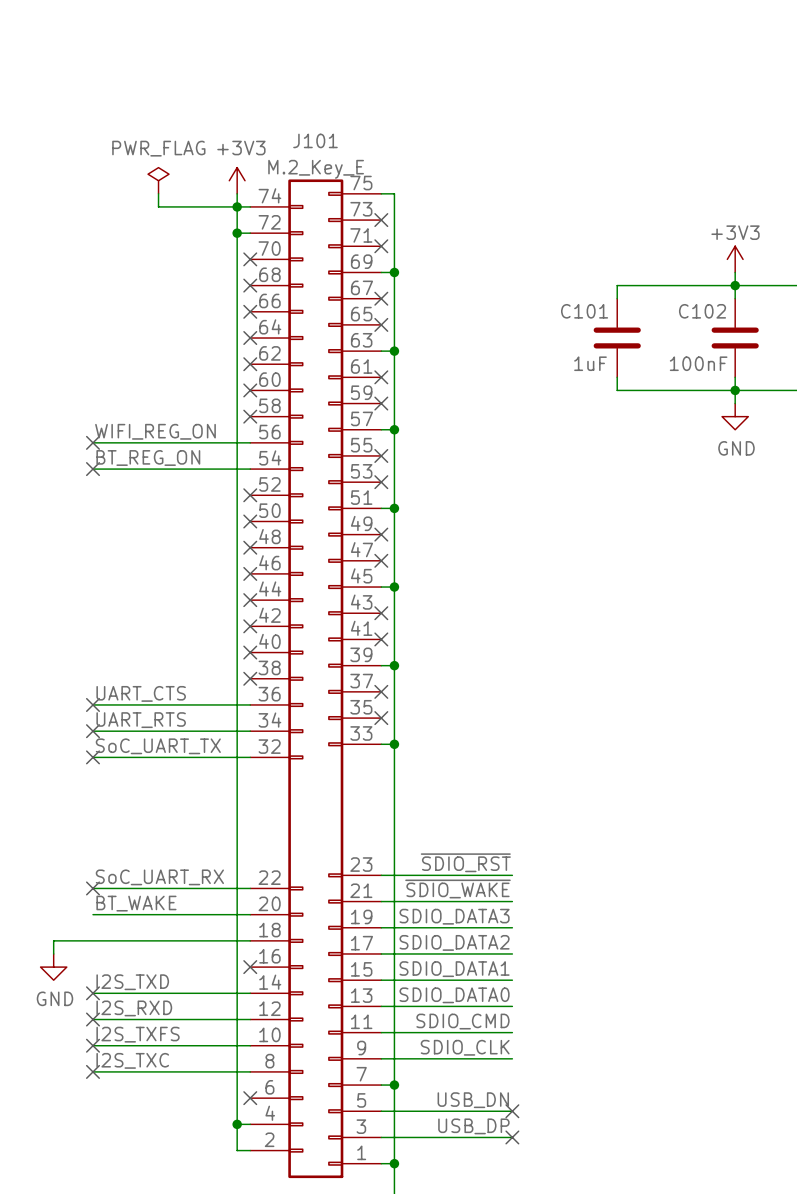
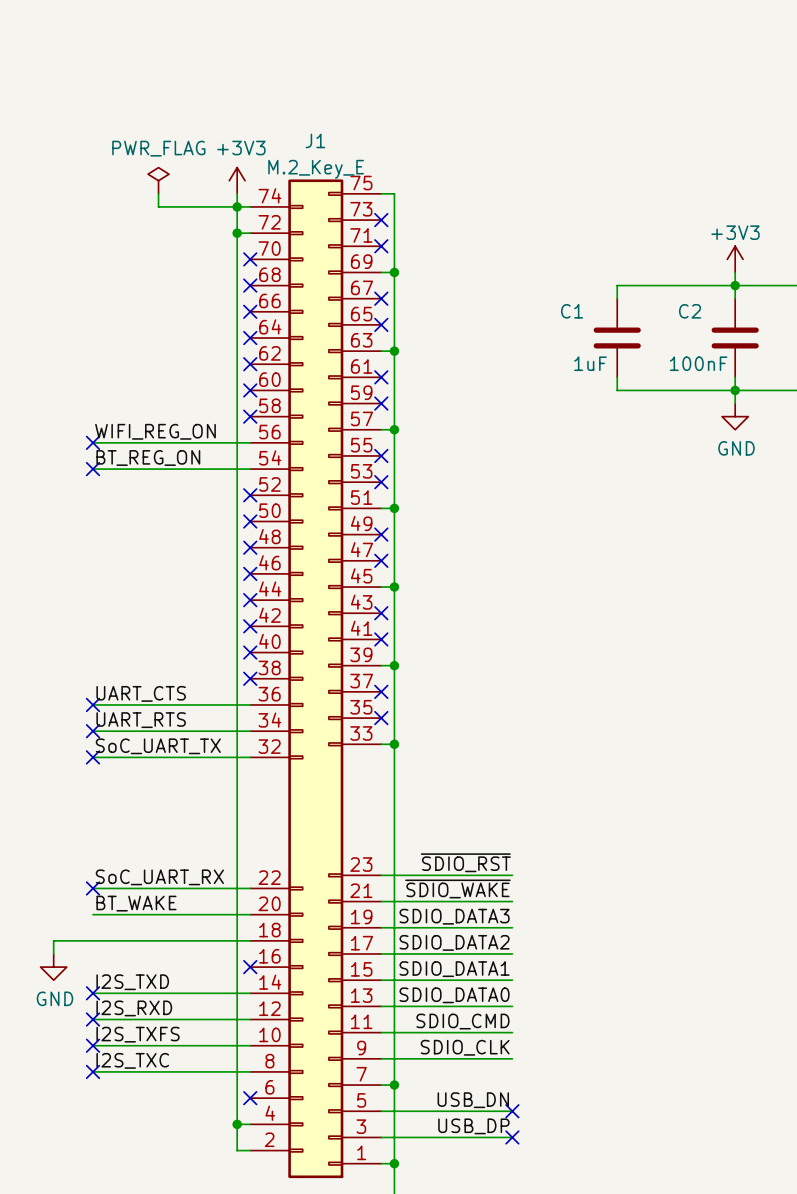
J101 name: J101 (315, 140) -> J1 (315, 140)
C101 name: C101 (584, 311) -> C1 (572, 311)
C102 name: C102 (702, 311) -> C2 (690, 311)

